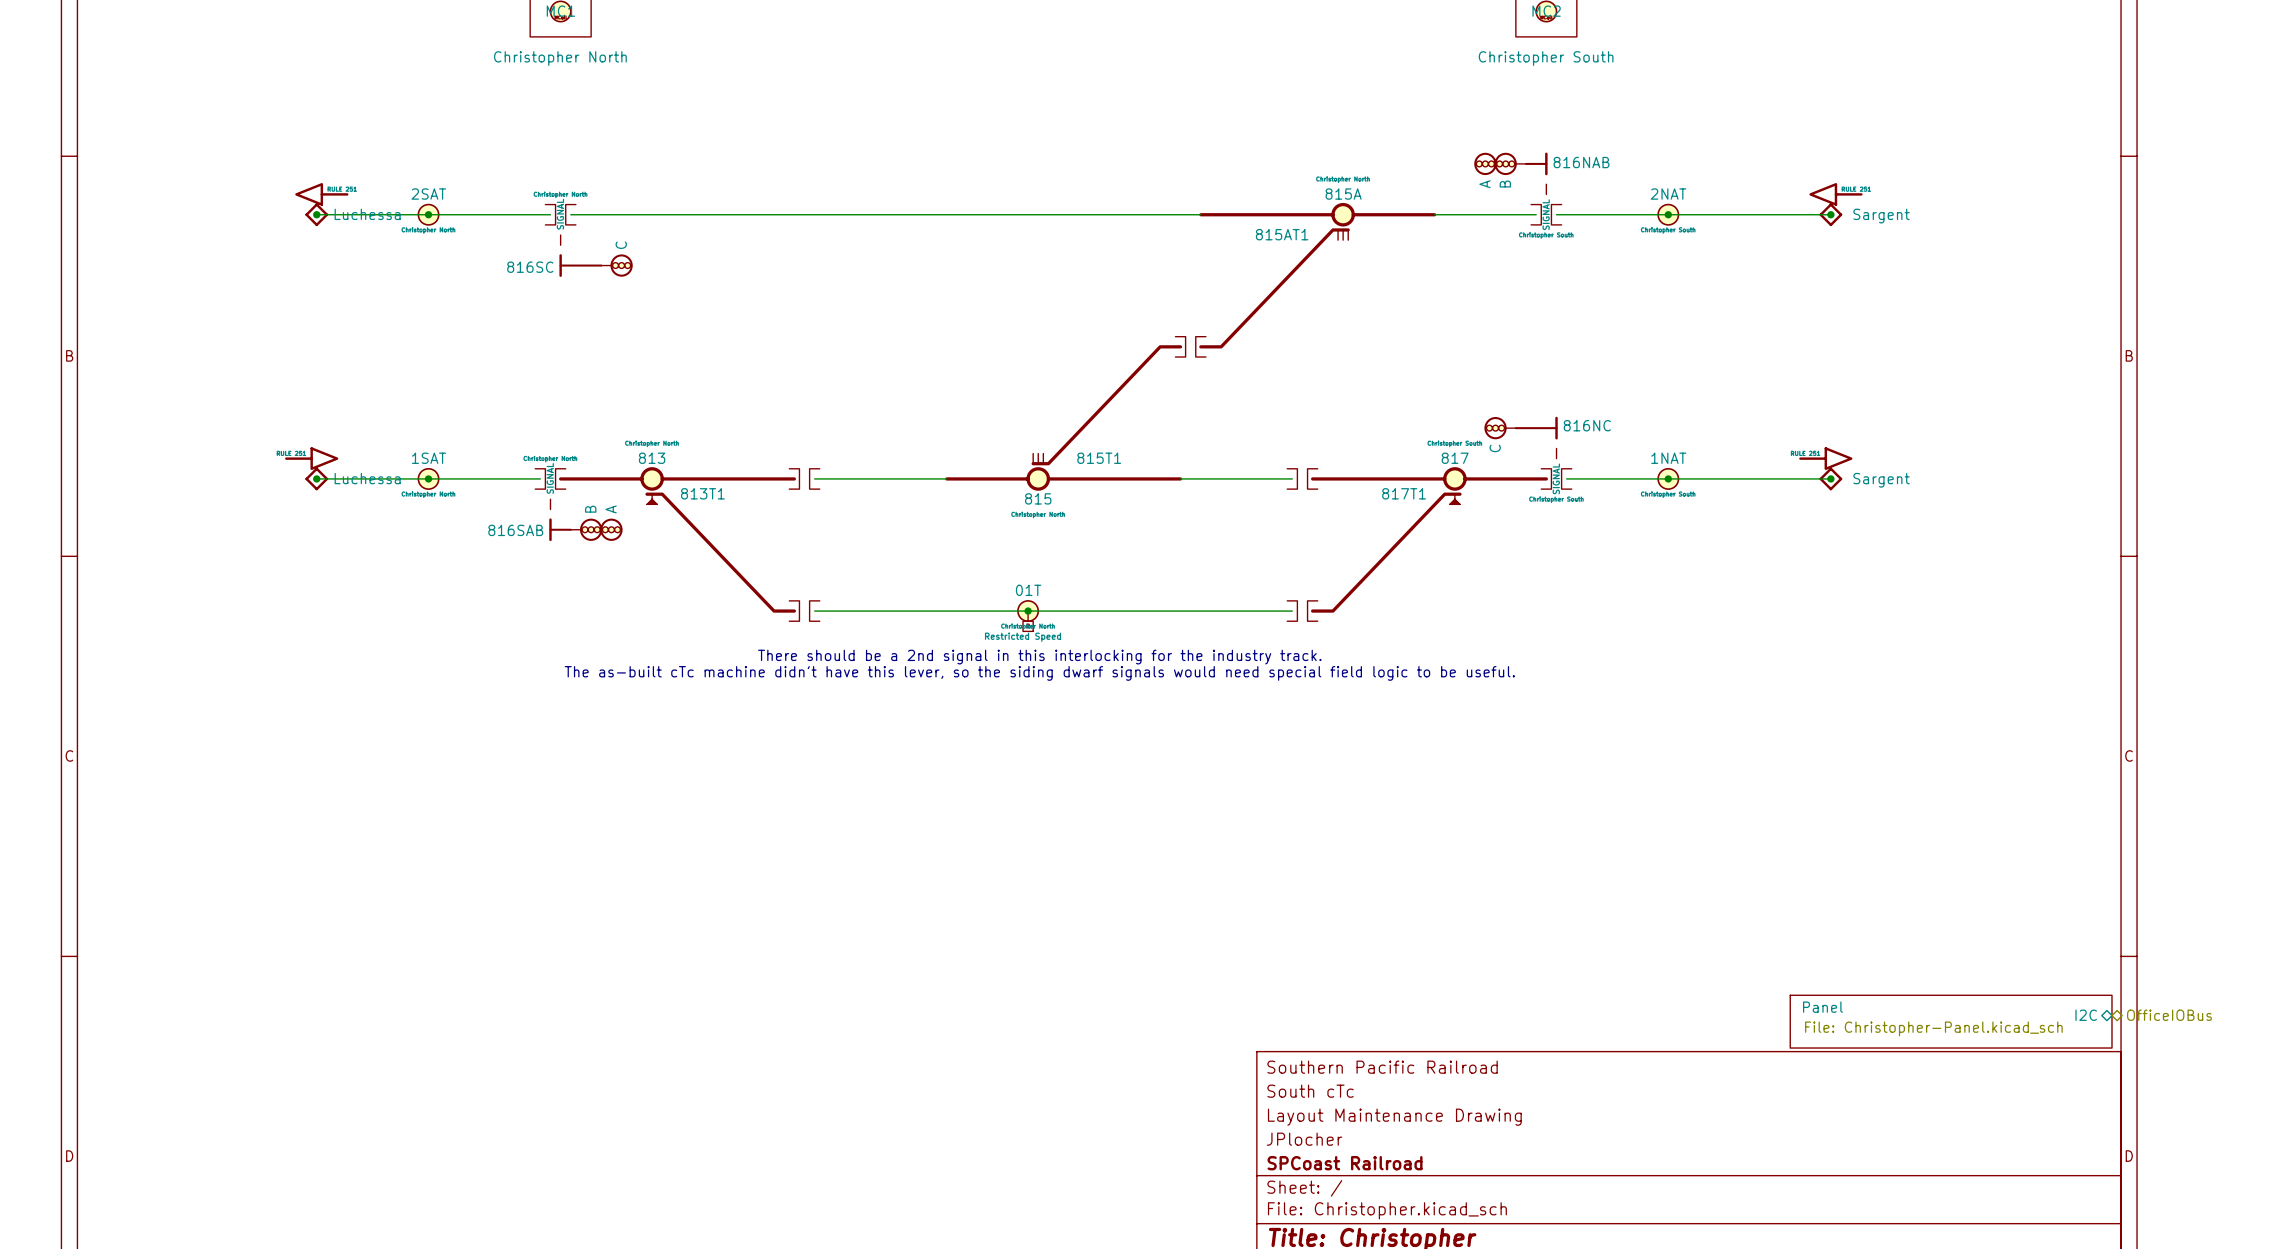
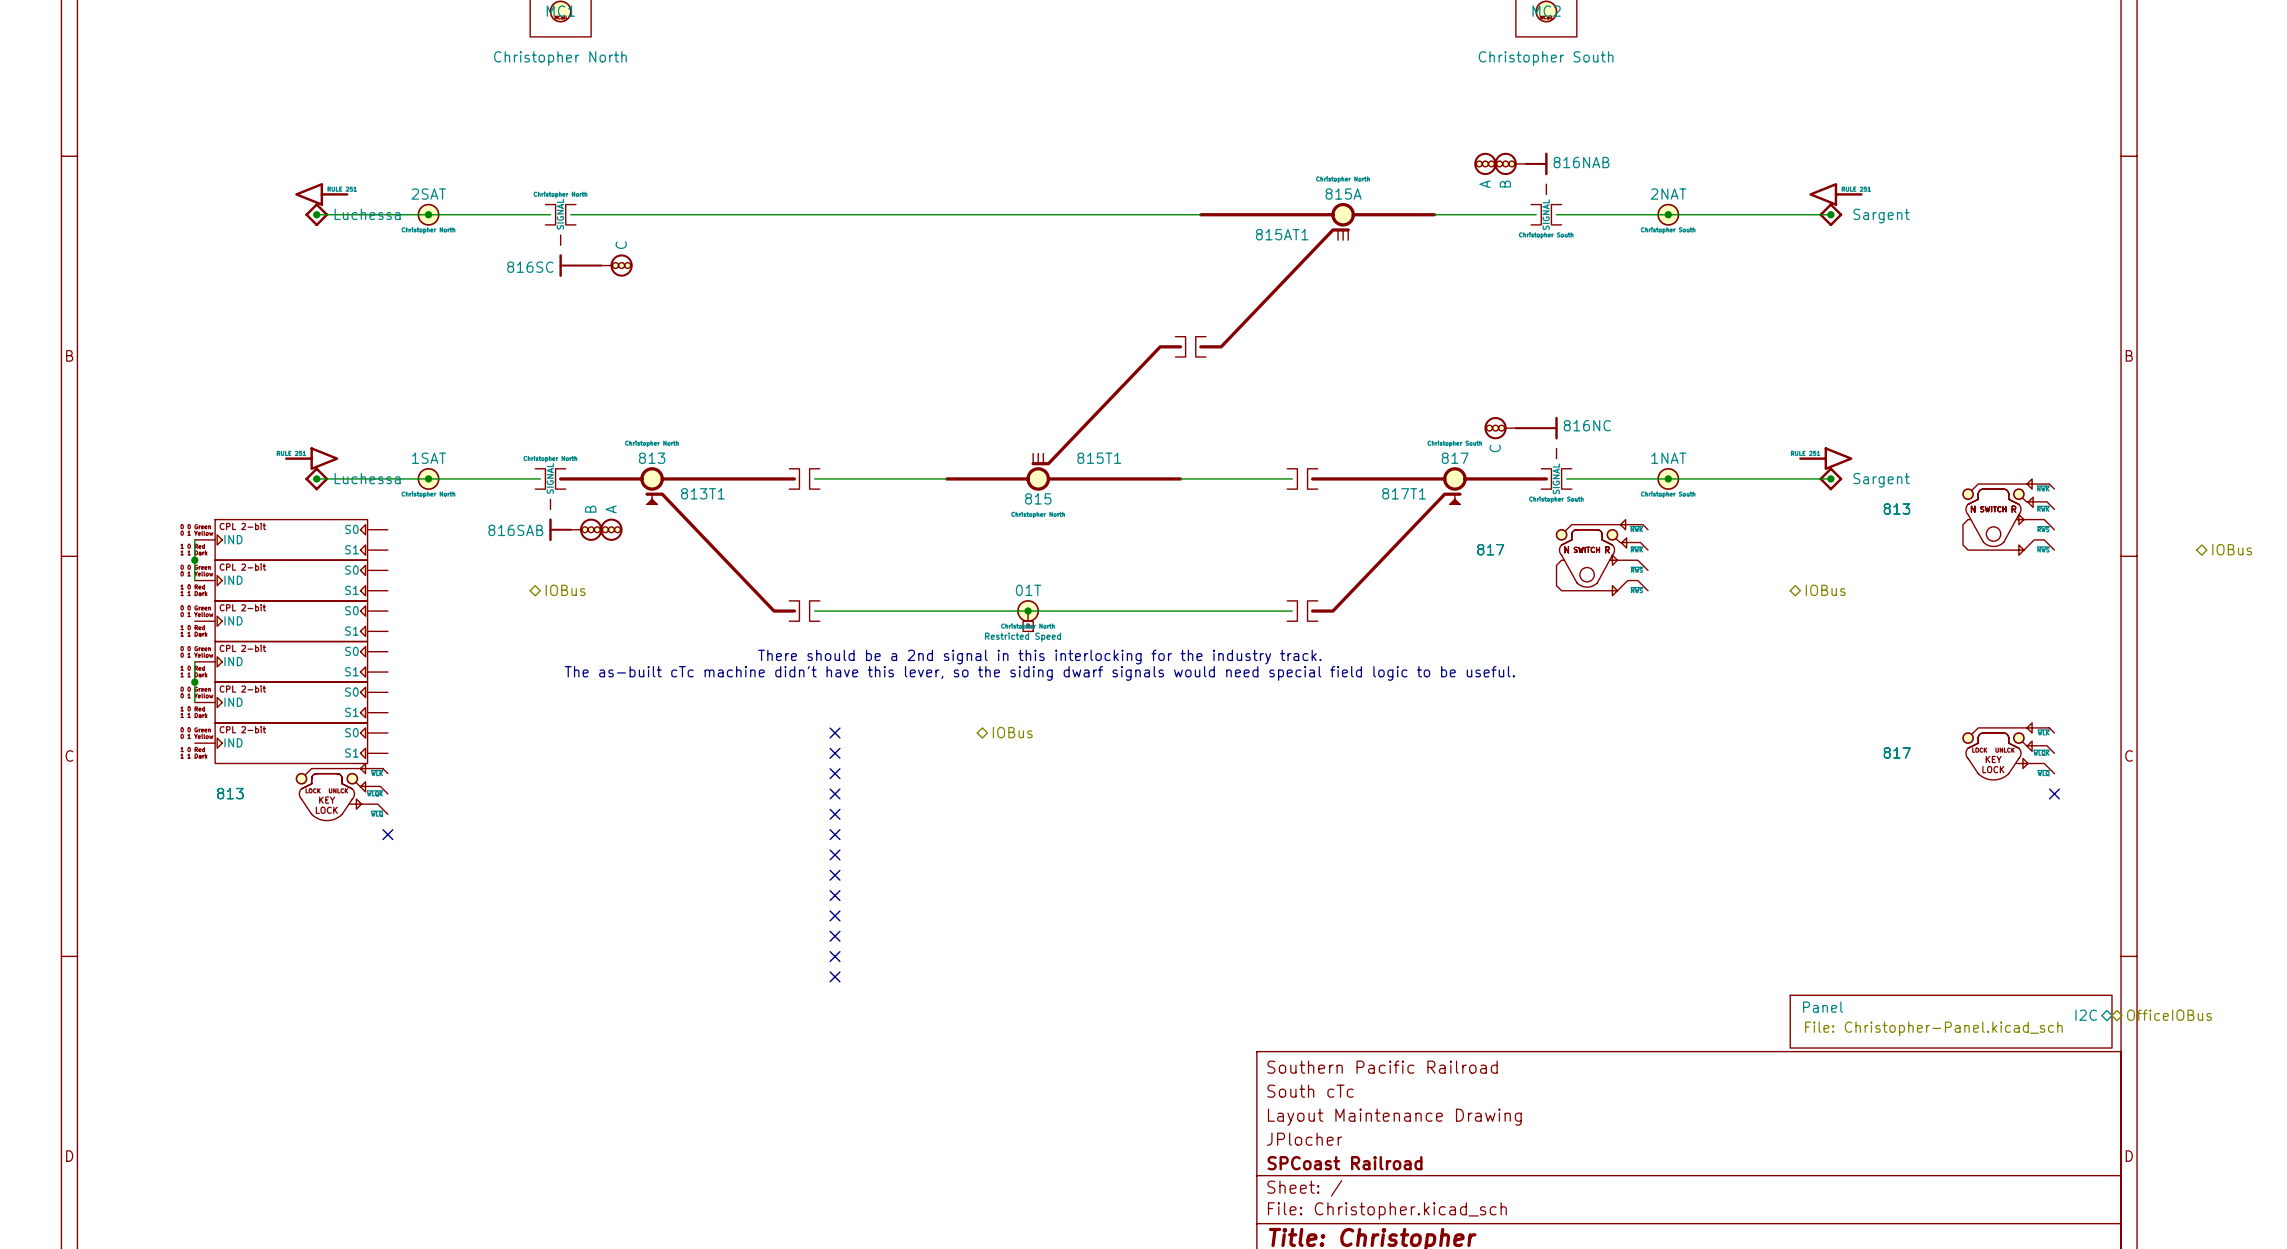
part: none -> 813 (2008, 494)
part: none -> 813 (2008, 522)
part: none -> 817 (1601, 534)
wire: none -> (194, 539) (194, 580)
part: none -> (291, 539)
hierarchical label: none -> IOBus (2232, 549)
junction: none -> (194, 560)
part: none -> 817 (1602, 562)
part: none -> (291, 580)
hierarchical label: none -> IOBus (565, 590)
hierarchical label: none -> IOBus (1825, 590)
part: none -> (291, 621)
wire: none -> (194, 661) (194, 702)
part: none -> (291, 661)
junction: none -> (194, 682)
part: none -> (291, 702)
hierarchical label: none -> IOBus (1012, 732)
no-connect mark: none -> (835, 733)
part: none -> 817 (2008, 738)
part: none -> (291, 743)
no-connect mark: none -> (835, 753)
part: none -> 817 (2010, 756)
no-connect mark: none -> (835, 773)
part: none -> 813 (341, 778)
no-connect mark: none -> (835, 793)
no-connect mark: none -> (2054, 793)
part: none -> 813 (343, 797)
no-connect mark: none -> (835, 814)
no-connect mark: none -> (387, 834)
no-connect mark: none -> (835, 834)
no-connect mark: none -> (835, 854)
no-connect mark: none -> (835, 875)
no-connect mark: none -> (835, 895)
no-connect mark: none -> (835, 915)
no-connect mark: none -> (835, 936)
no-connect mark: none -> (835, 956)
no-connect mark: none -> (835, 976)

